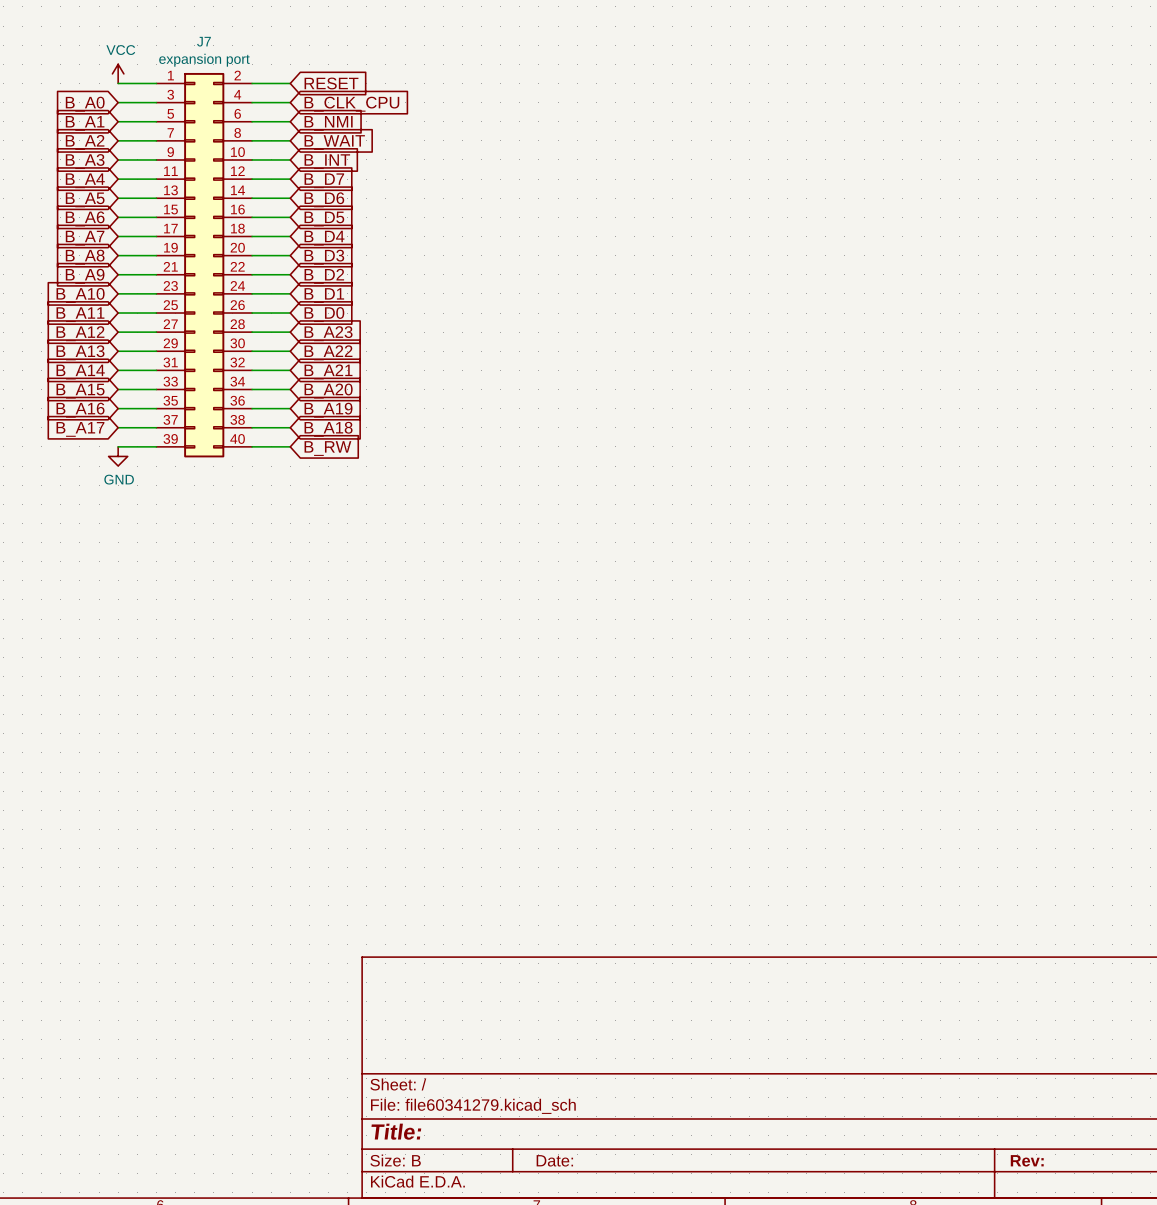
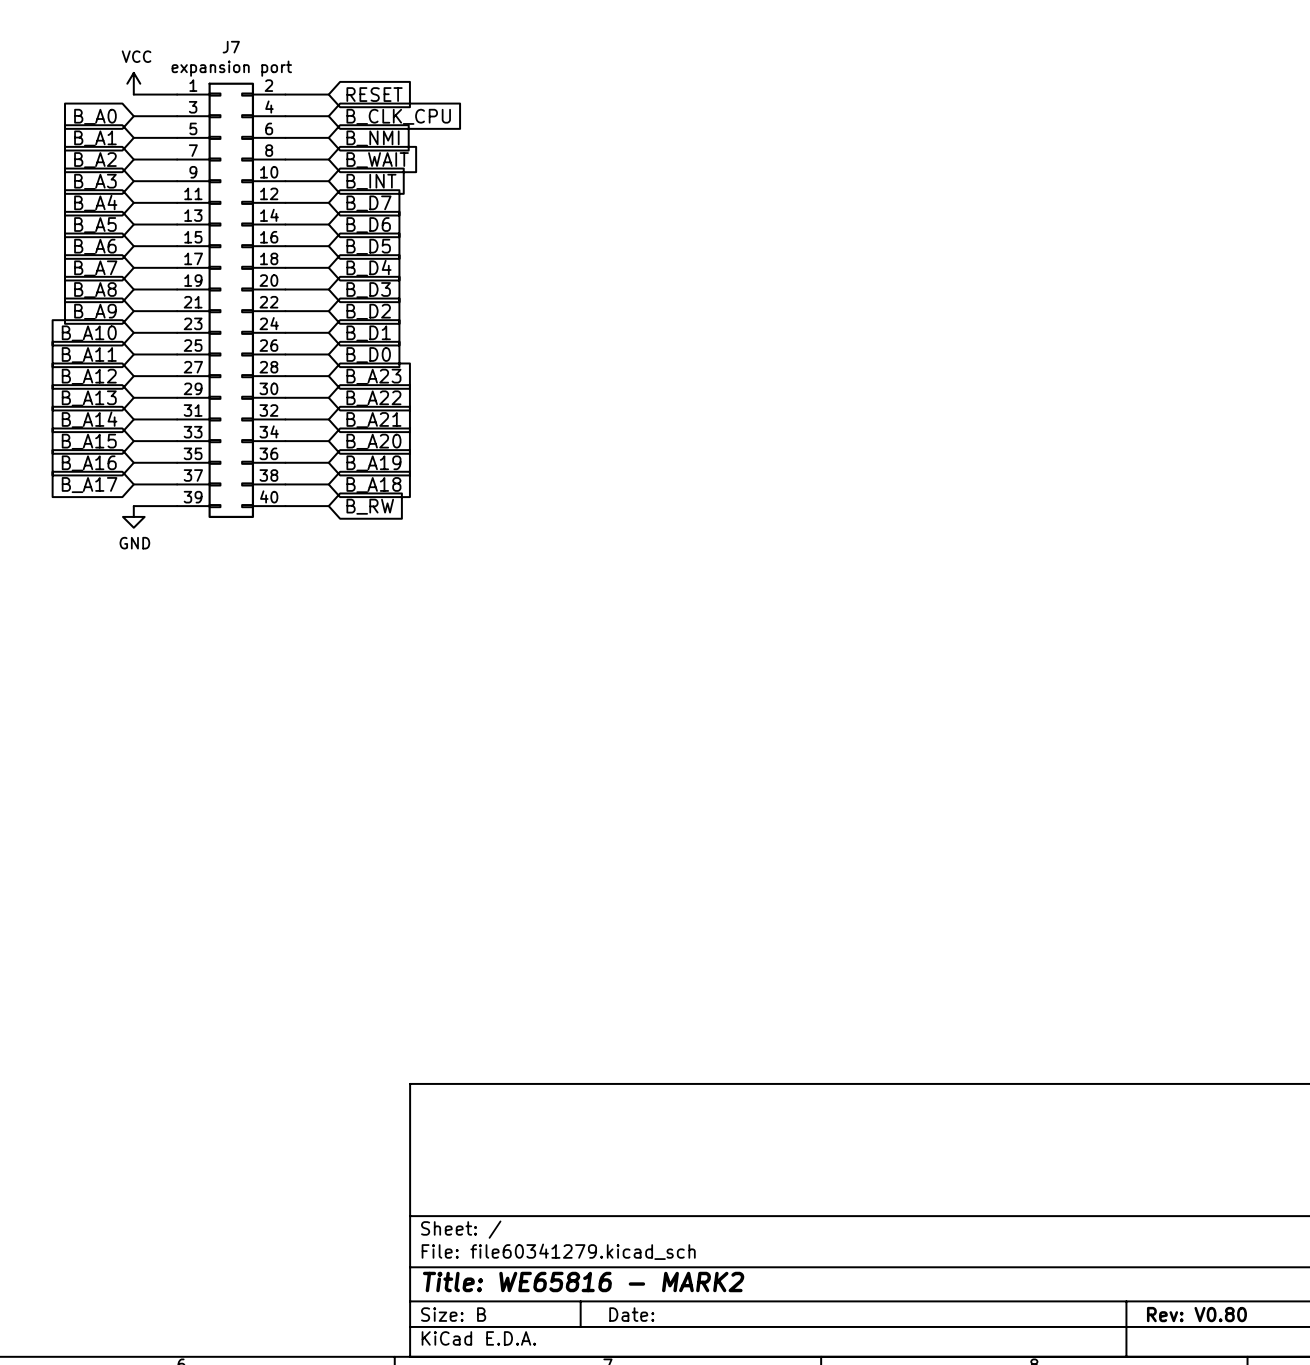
title block: Title: (396, 1131) -> Title: WE65816 - MARK2 (583, 1281)
title block: Rev: (1027, 1160) -> Rev: V0.80 (1196, 1314)

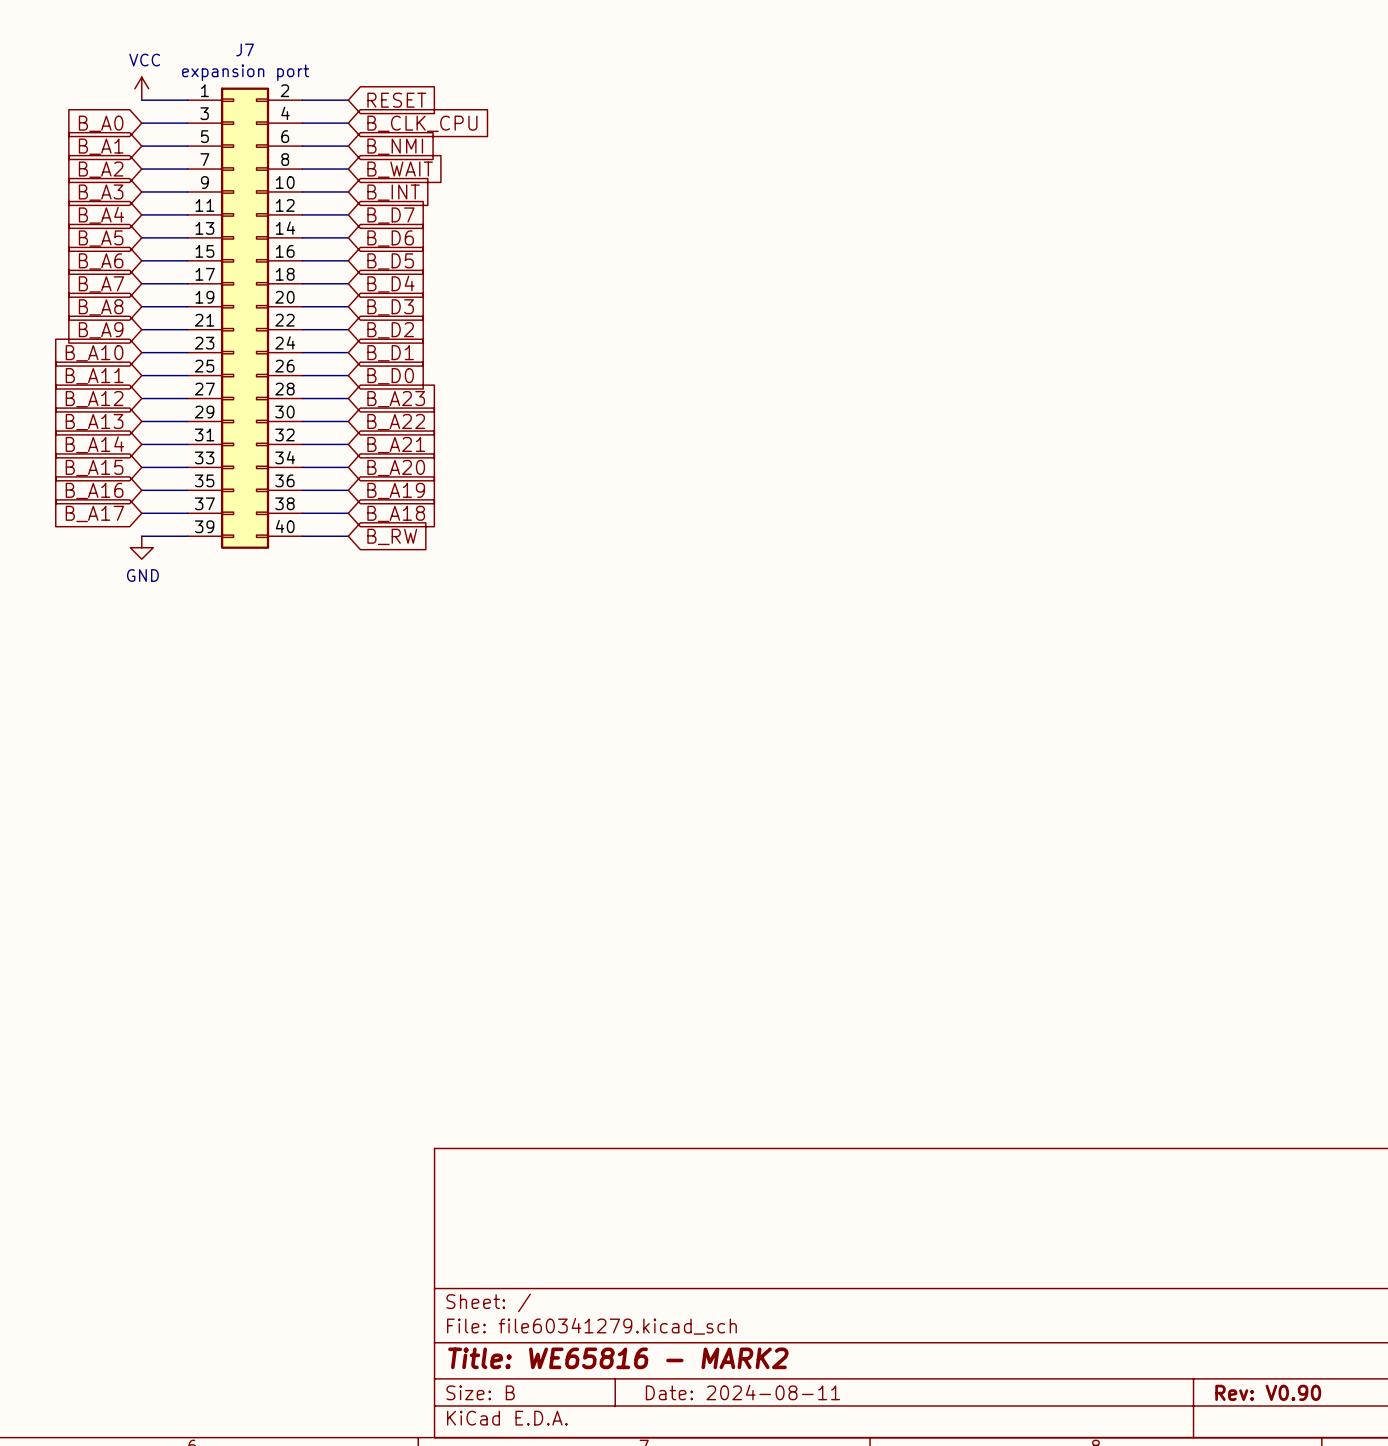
title block: Date: (631, 1314) -> Date: 2024-08-11 (742, 1392)
title block: Rev: V0.80 (1196, 1314) -> Rev: V0.90 (1268, 1392)

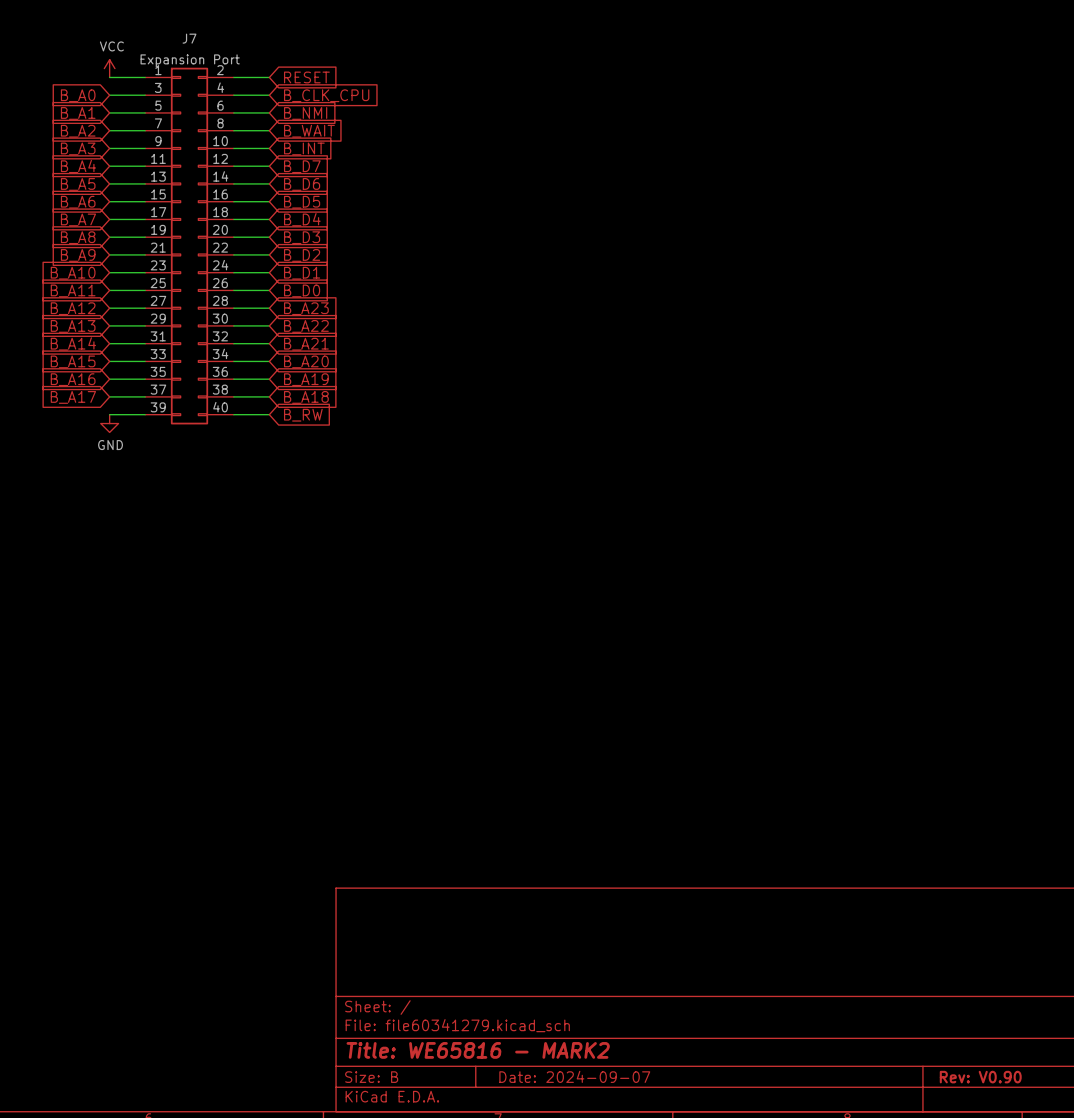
J7 value: expansion port (245, 72) -> Expansion Port (190, 60)
title block: Date: 2024-08-11 (742, 1392) -> Date: 2024-09-07 (574, 1076)

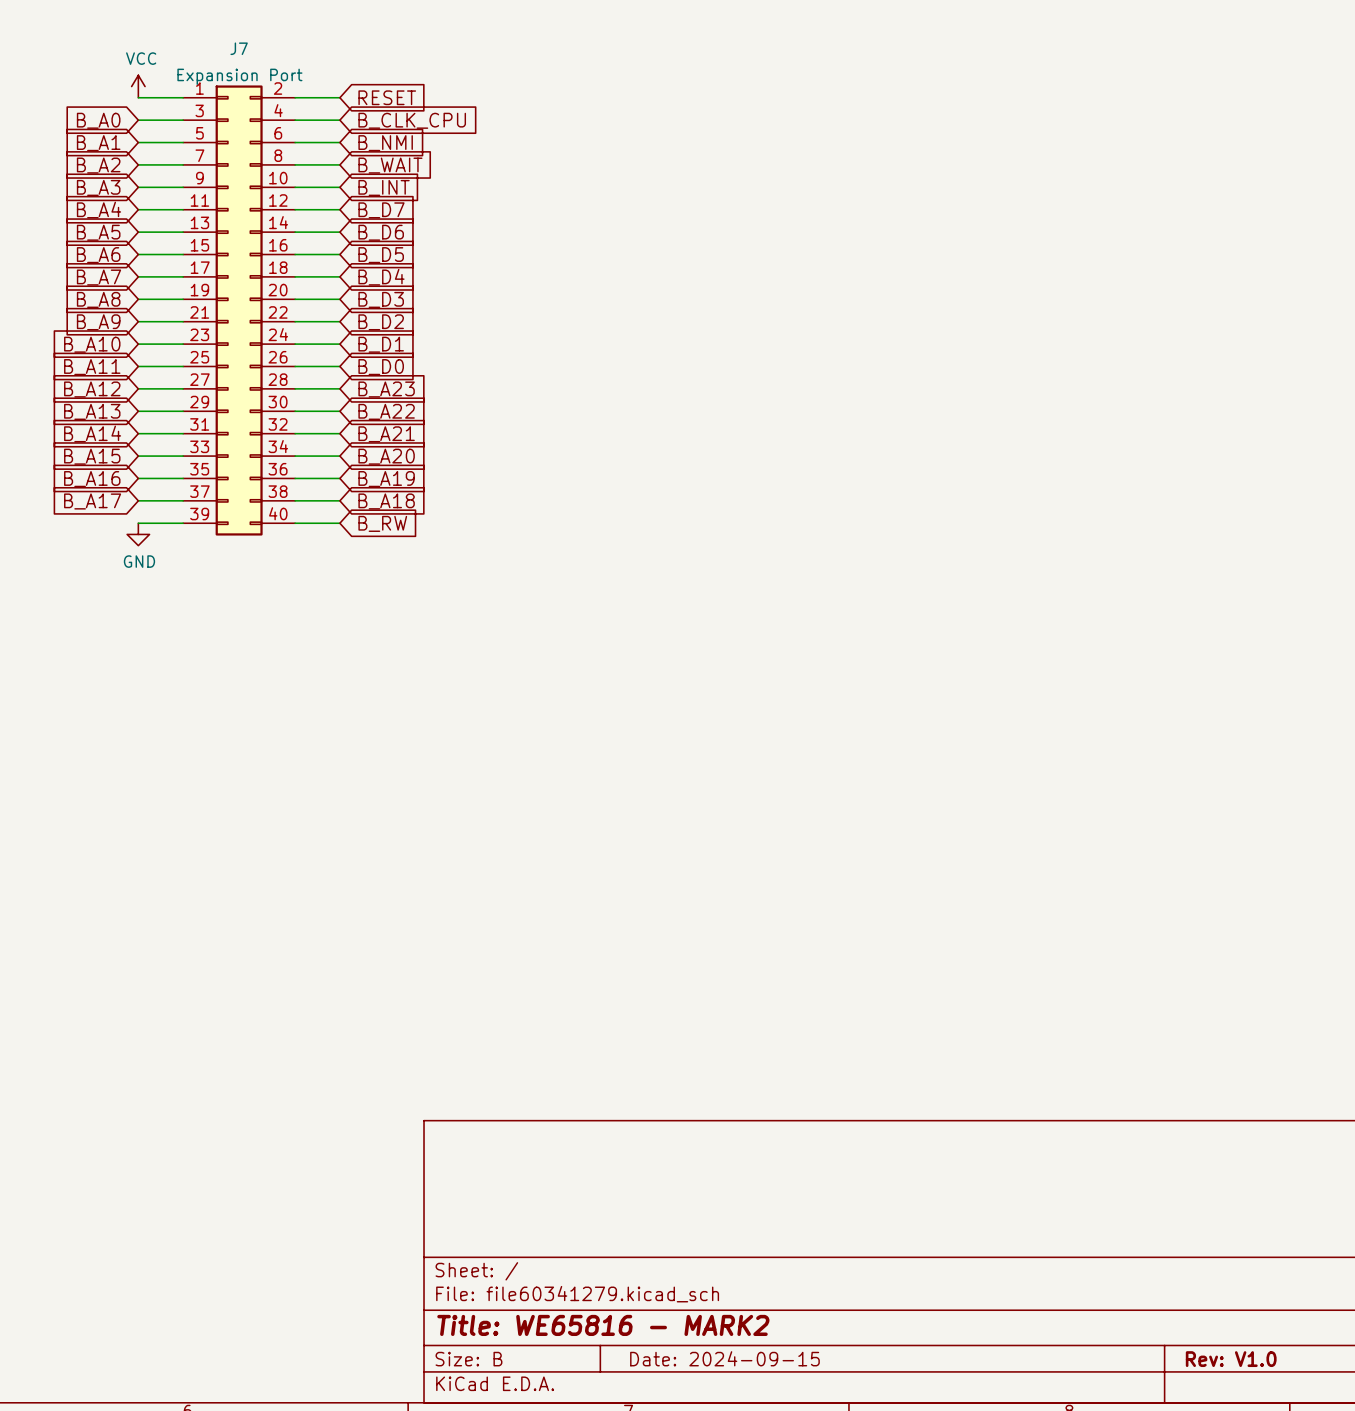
title block: Date: 2024-09-07 (574, 1076) -> Date: 2024-09-15 (724, 1358)
title block: Rev: V0.90 (980, 1077) -> Rev: V1.0 (1231, 1359)

